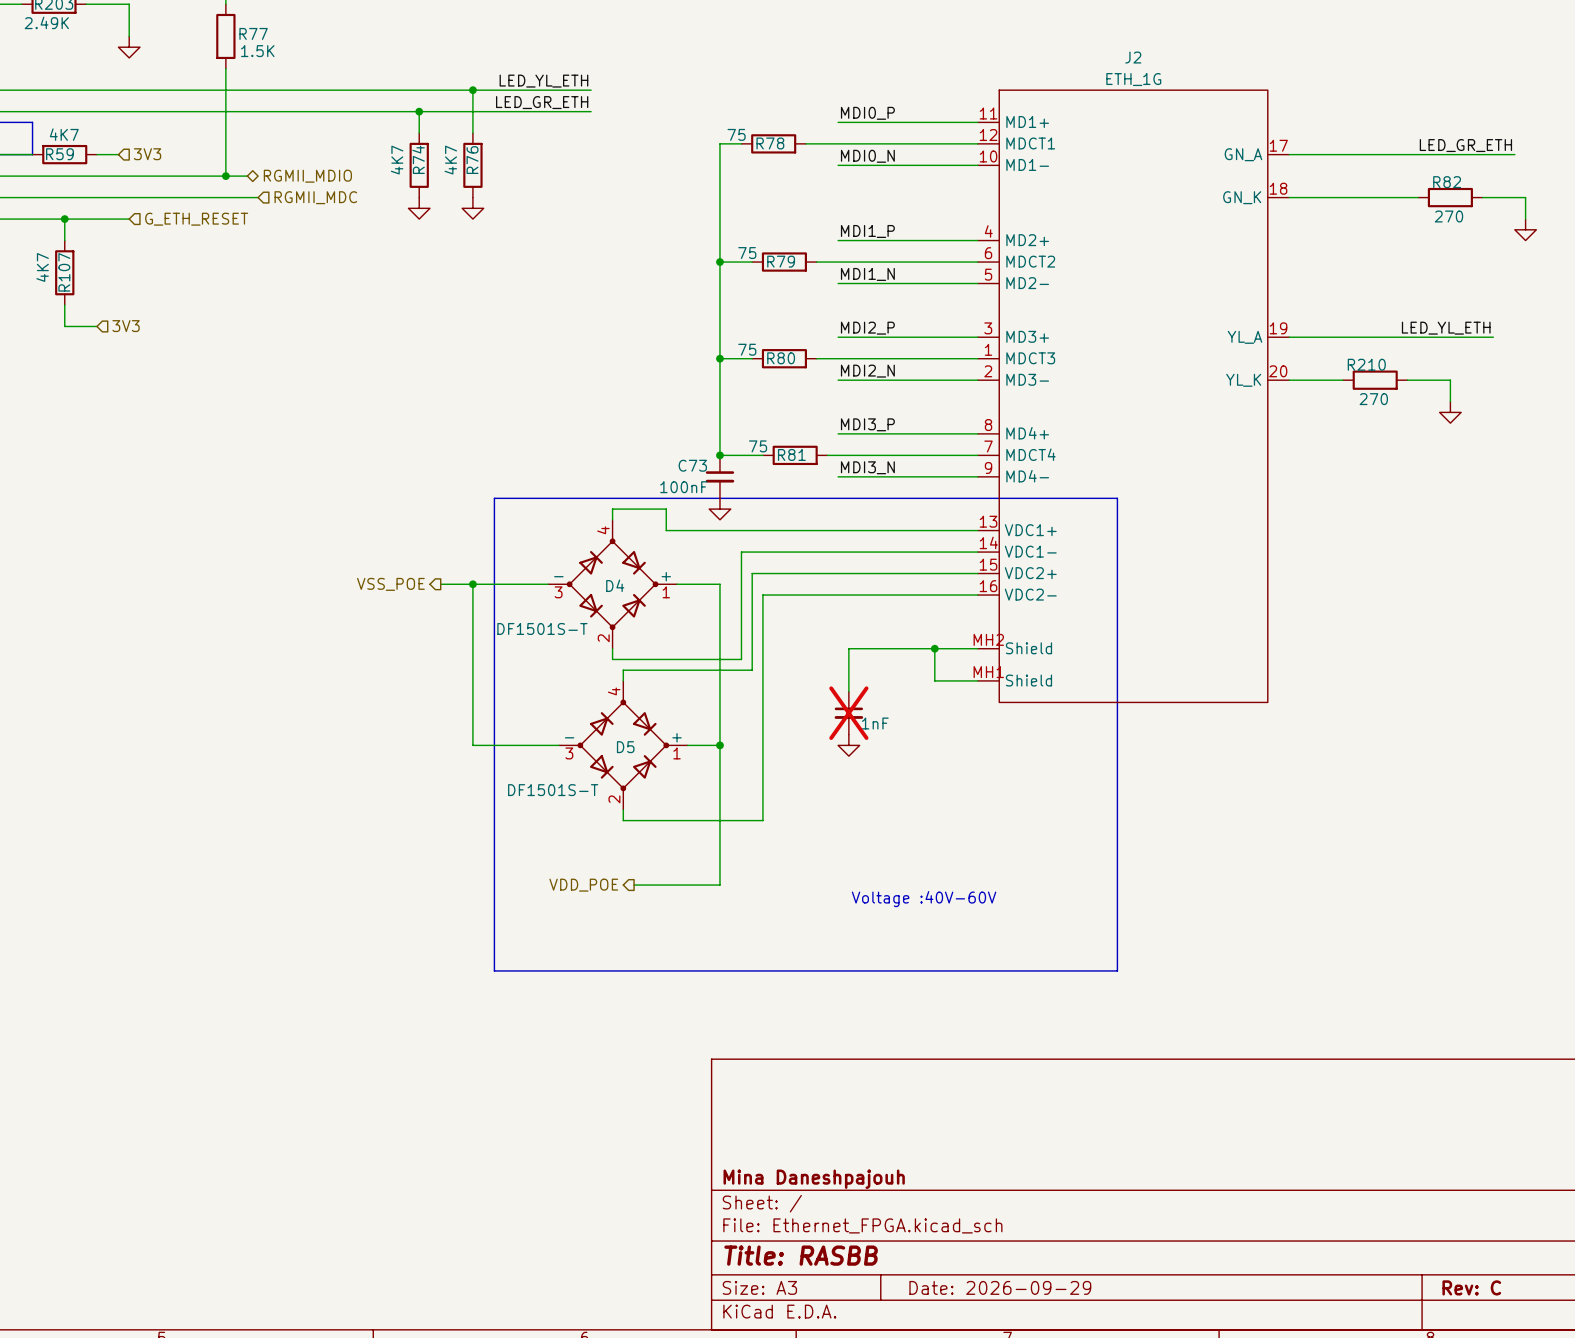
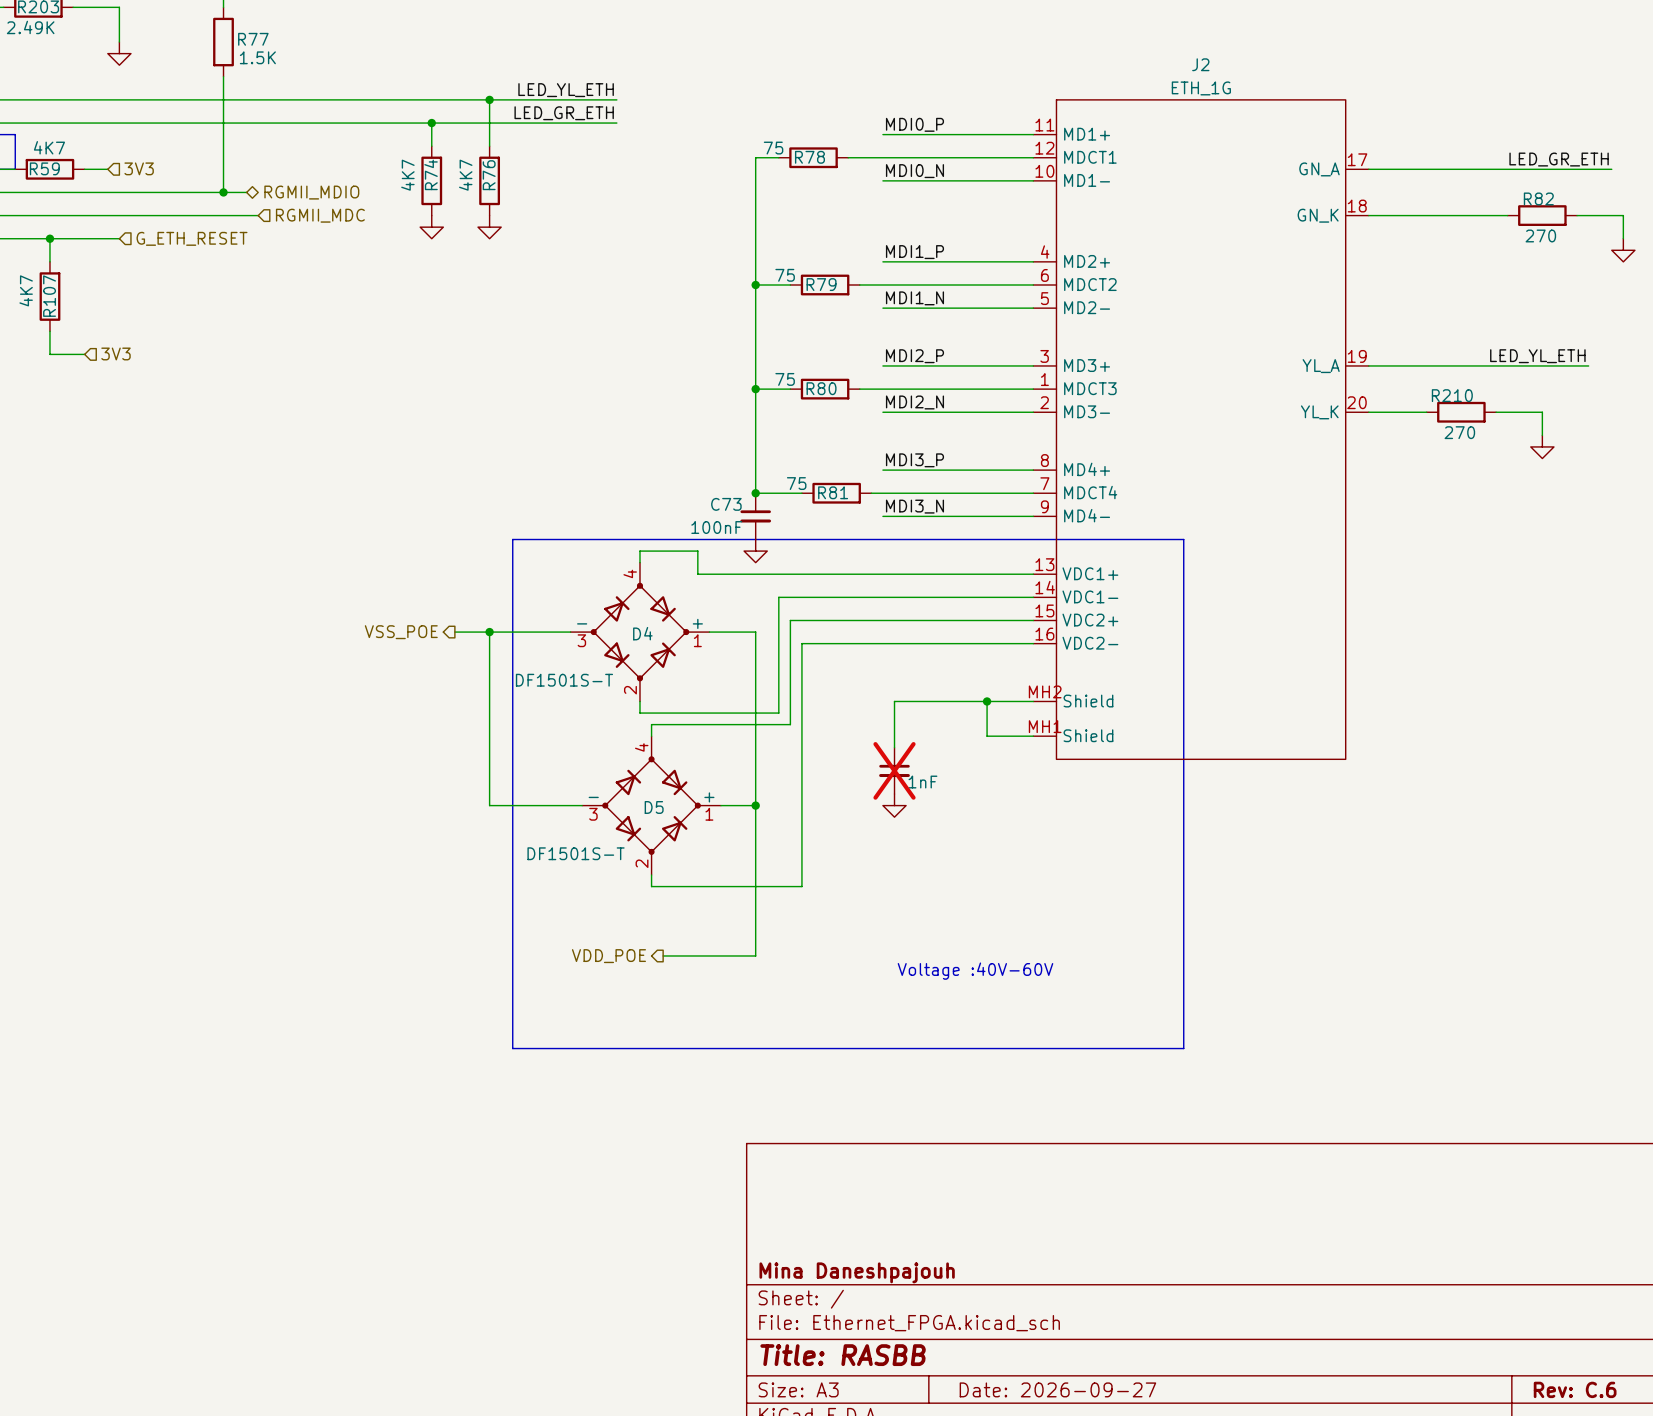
title block: Date: 2026-09-29 (1000, 1287) -> Date: 2026-09-27 (1057, 1389)
title block: Rev: C (1471, 1287) -> Rev: C.6 (1575, 1389)

